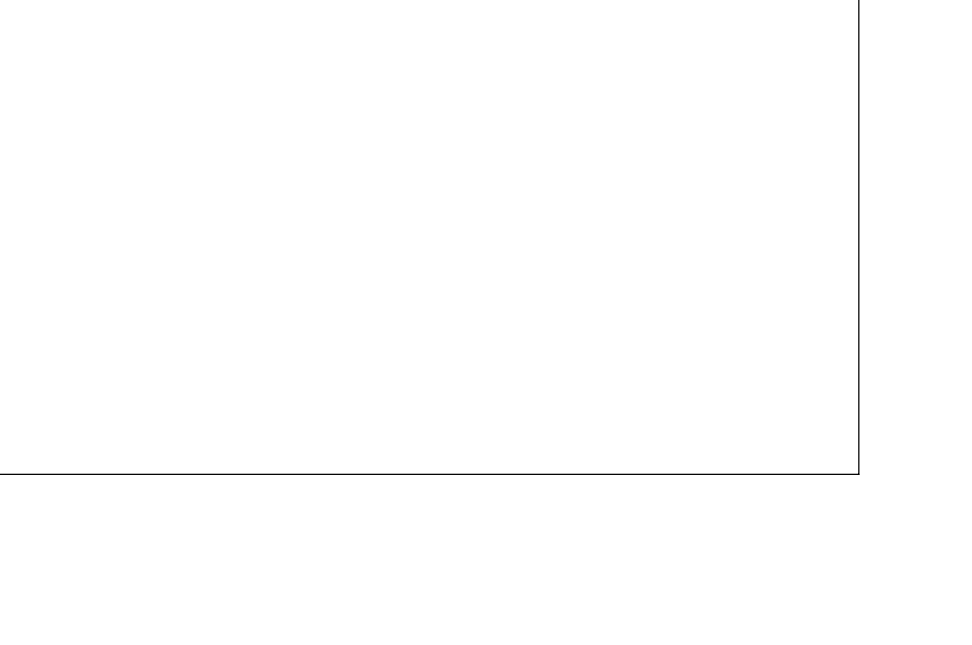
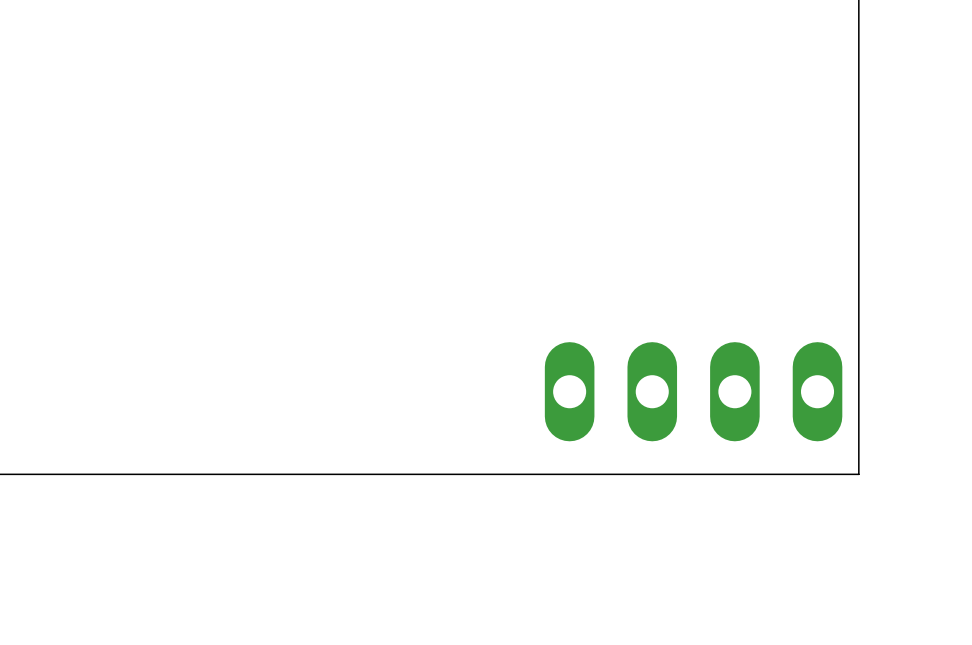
part: none -> (693, 391)

